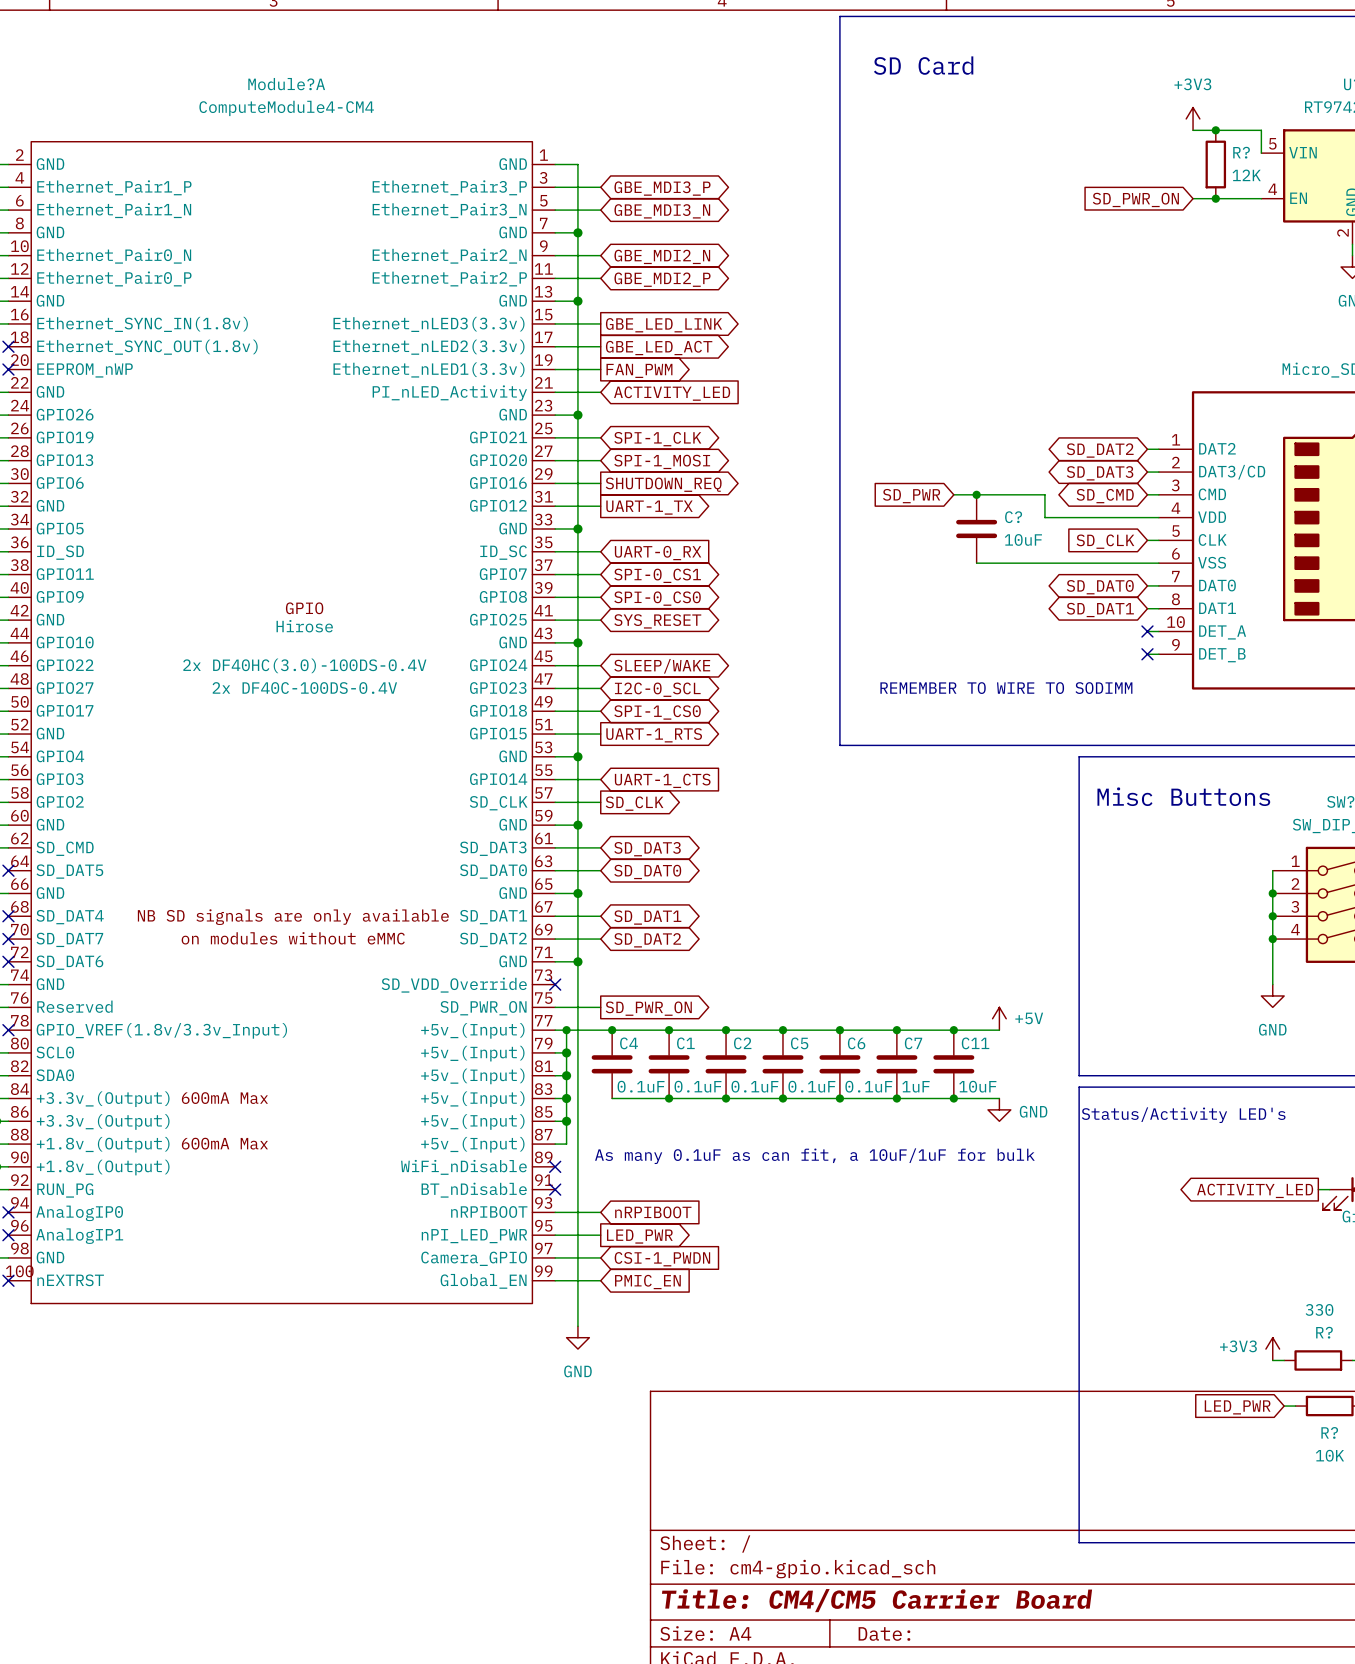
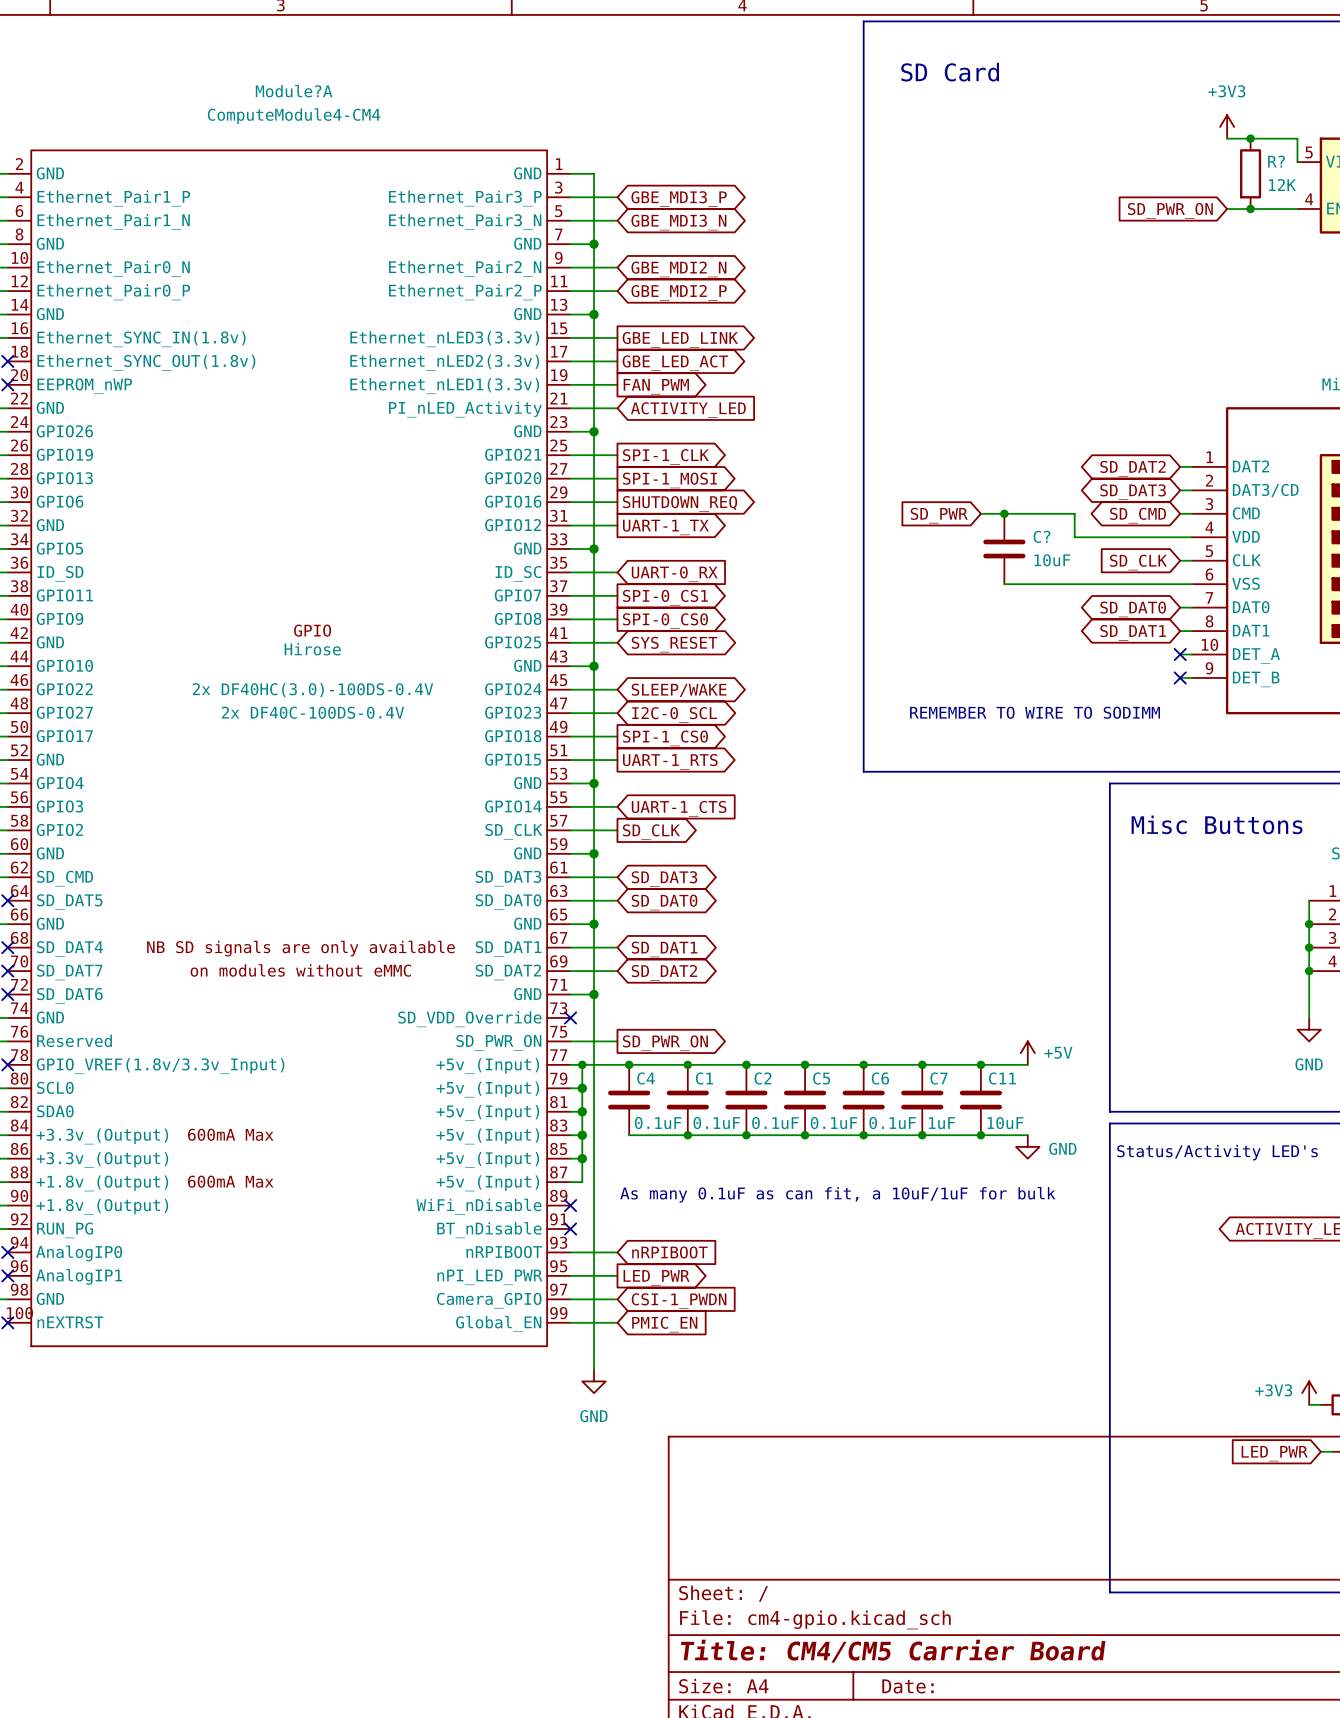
global label shape: bidirectional (657, 439) -> output (665, 457)
global label shape: bidirectional (662, 461) -> output (670, 480)
global label shape: bidirectional (657, 575) -> output (665, 597)
global label shape: bidirectional (657, 598) -> output (665, 621)
global label shape: bidirectional (657, 712) -> output (665, 738)

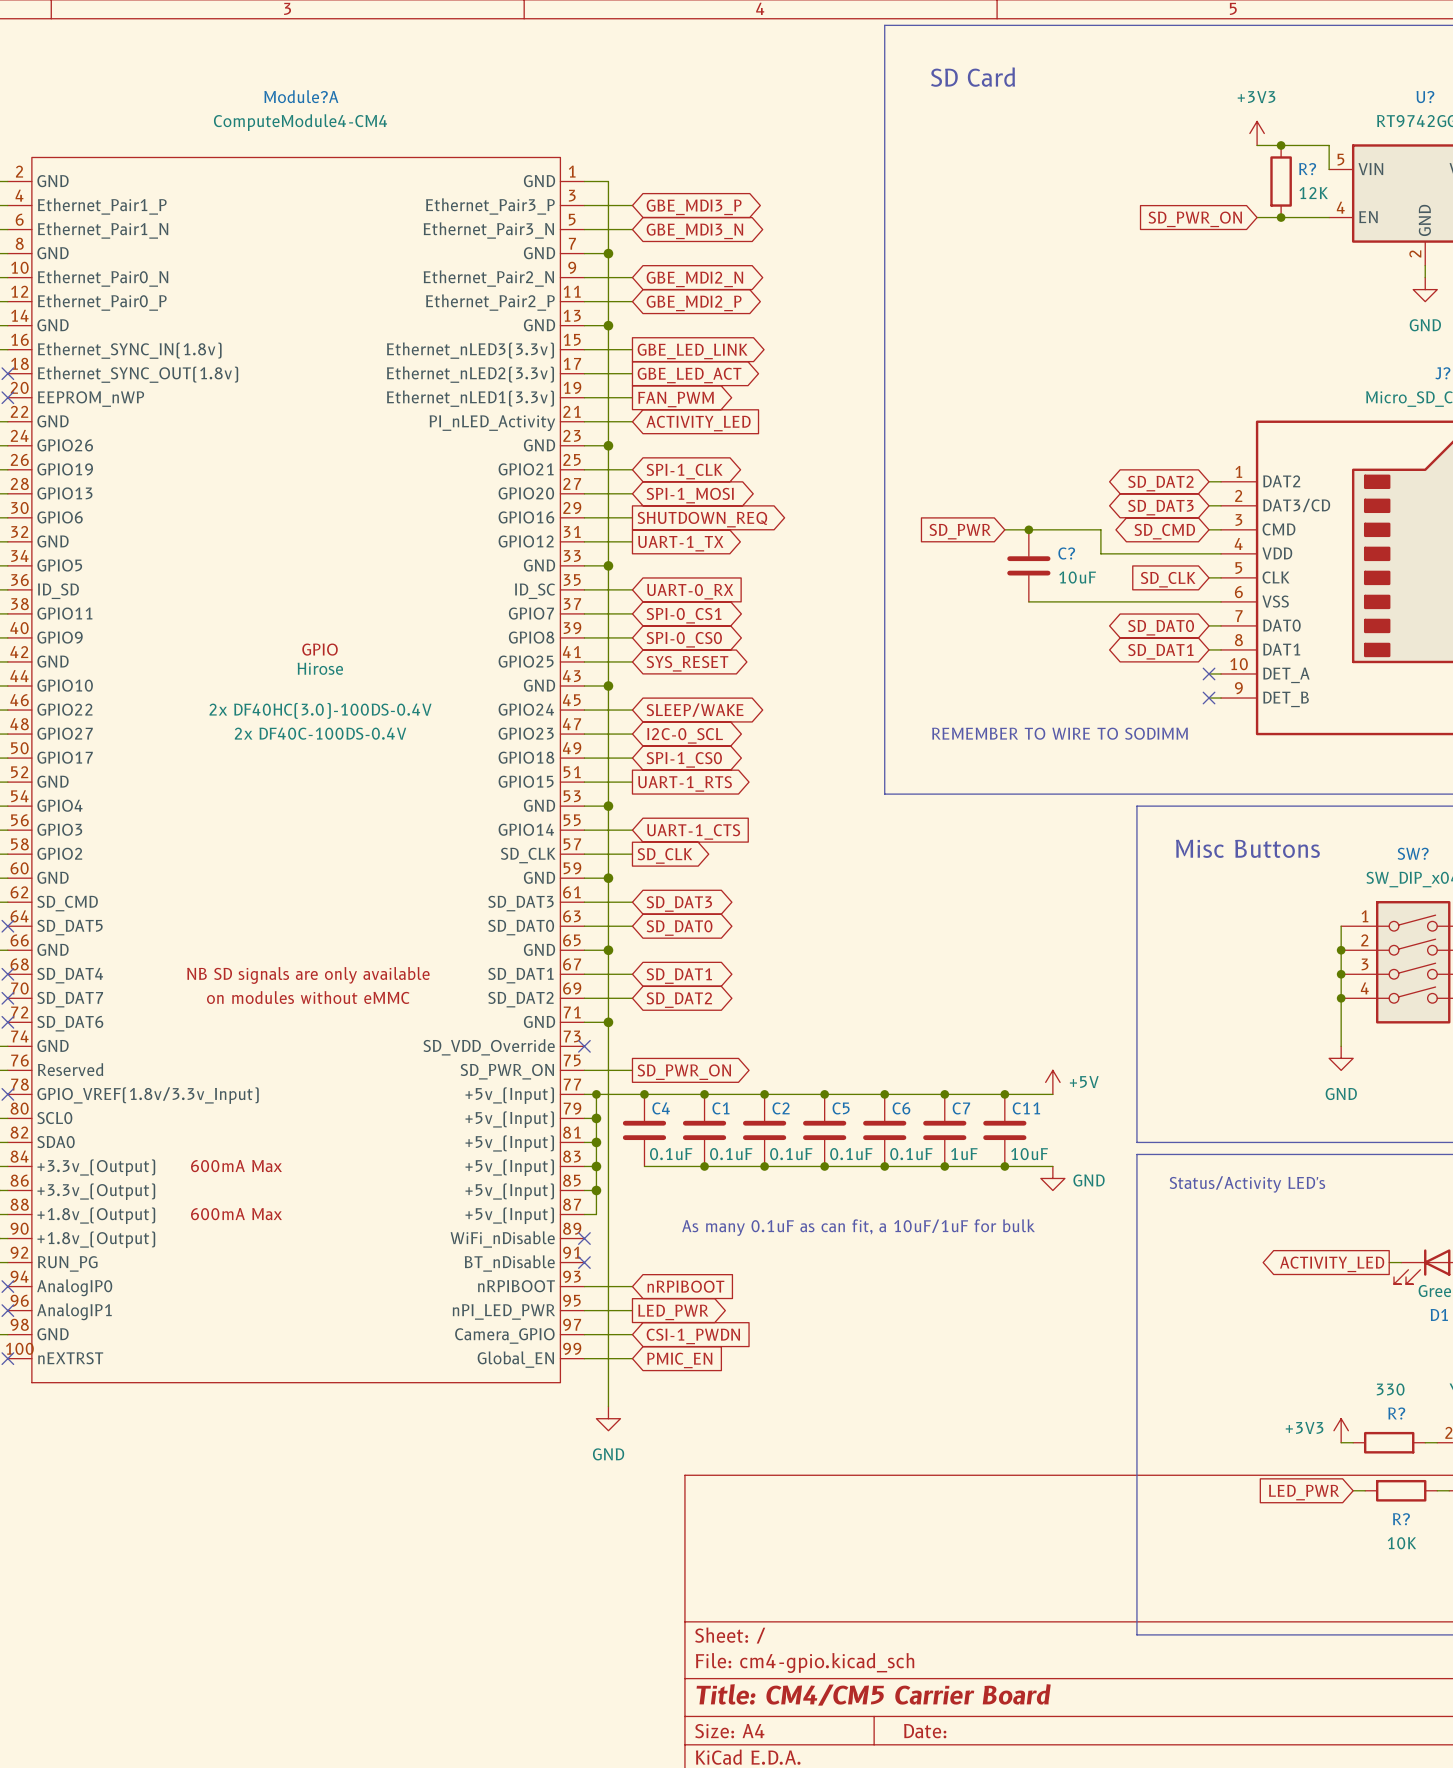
global label shape: output (665, 457) -> bidirectional (684, 471)
global label shape: output (670, 480) -> bidirectional (690, 495)
global label shape: output (665, 597) -> bidirectional (684, 615)
global label shape: output (665, 621) -> bidirectional (684, 639)
global label shape: output (665, 738) -> bidirectional (684, 759)

